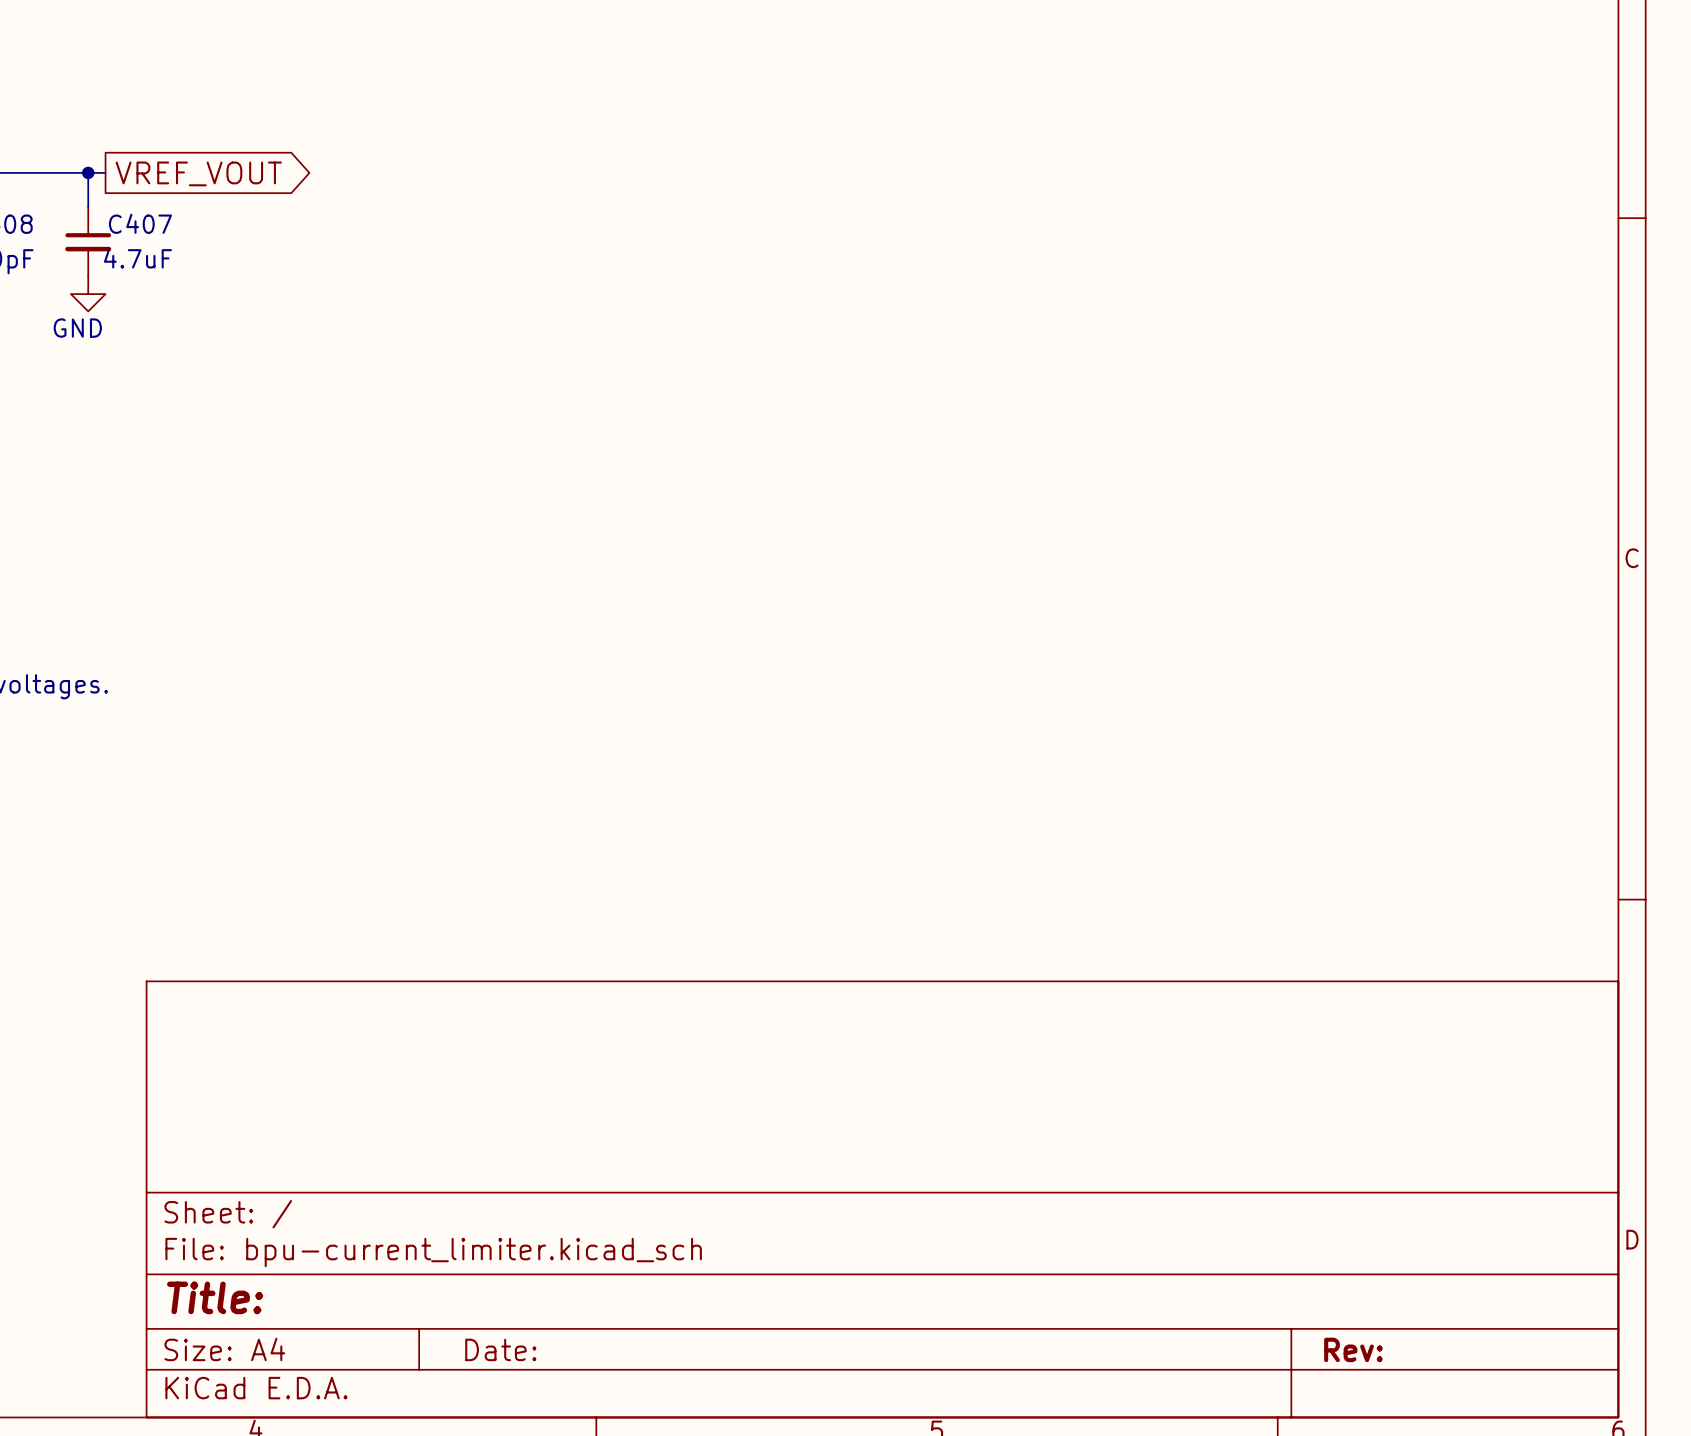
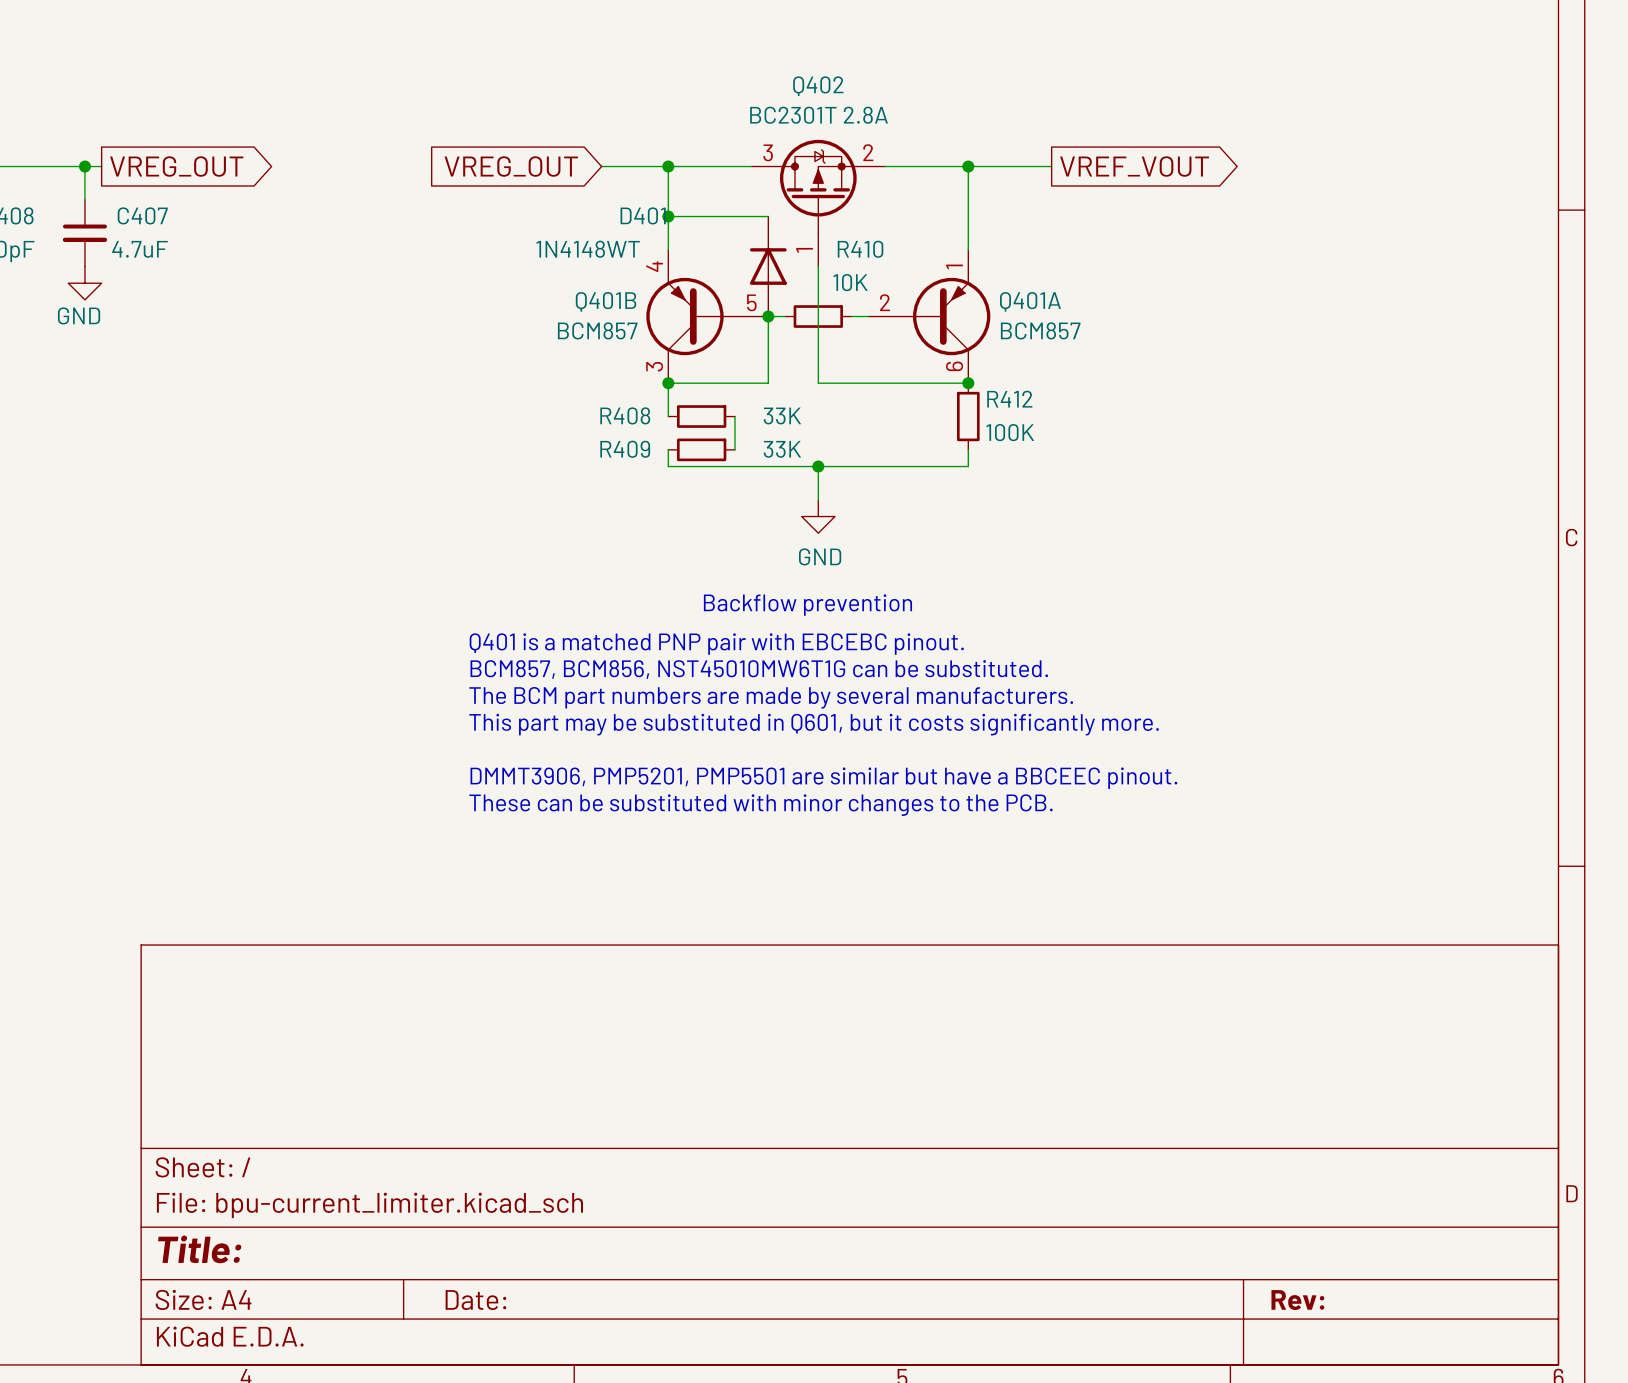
wire: none -> (601, 166) (751, 166)
wire: none -> (668, 166) (668, 249)
junction: none -> (668, 166)
wire: none -> (884, 166) (1051, 166)
wire: none -> (968, 166) (968, 249)
junction: none -> (968, 166)
global label: VREF_VOUT (198, 173) -> VREG_OUT (176, 166)
global label: none -> VREG_OUT (511, 166)
global label: none -> VREF_VOUT (1134, 166)
Q402: none -> BC2301T 2.8A (818, 203)
wire: none -> (668, 216) (768, 216)
junction: none -> (668, 216)
D401: none -> 1N4148WT (768, 266)
wire: none -> (818, 266) (818, 383) (968, 383)
Q401B: none -> BCM857 (707, 316)
junction: none -> (768, 316)
wire: none -> (784, 316) (768, 316) (768, 383) (668, 383) (668, 416)
R410: none -> 10K (818, 316)
wire: none -> (851, 316) (868, 316)
Q401A: none -> BCM857 (929, 316)
junction: none -> (668, 383)
junction: none -> (968, 383)
R408: none -> 33K (701, 416)
wire: none -> (734, 416) (734, 449)
R412: none -> 100K (968, 416)
wire: none -> (668, 449) (668, 466) (968, 466) (968, 449)
R409: none -> 33K (701, 449)
wire: none -> (818, 466) (818, 499)
junction: none -> (818, 466)
power symbol: none -> GND (818, 516)
text: none -> Backflow prevention (807, 605)
text: none -> Q401 is a matched PNP pair with EBCEBC pinout. (716, 644)
text: none -> BCM857, BCM856, NST45010MW6T1G can be substituted. (759, 669)
text: none -> The BCM part numbers are made by several manufacturers. (771, 697)
text: none -> This part may be substituted in Q601, but it costs significantly more. (814, 724)
text: none -> DMMT3906, PMP5201, PMP5501 are similar but have a BBCEEC pinout. (823, 778)
text: none -> These can be substituted with minor changes to the PCB. (760, 805)

